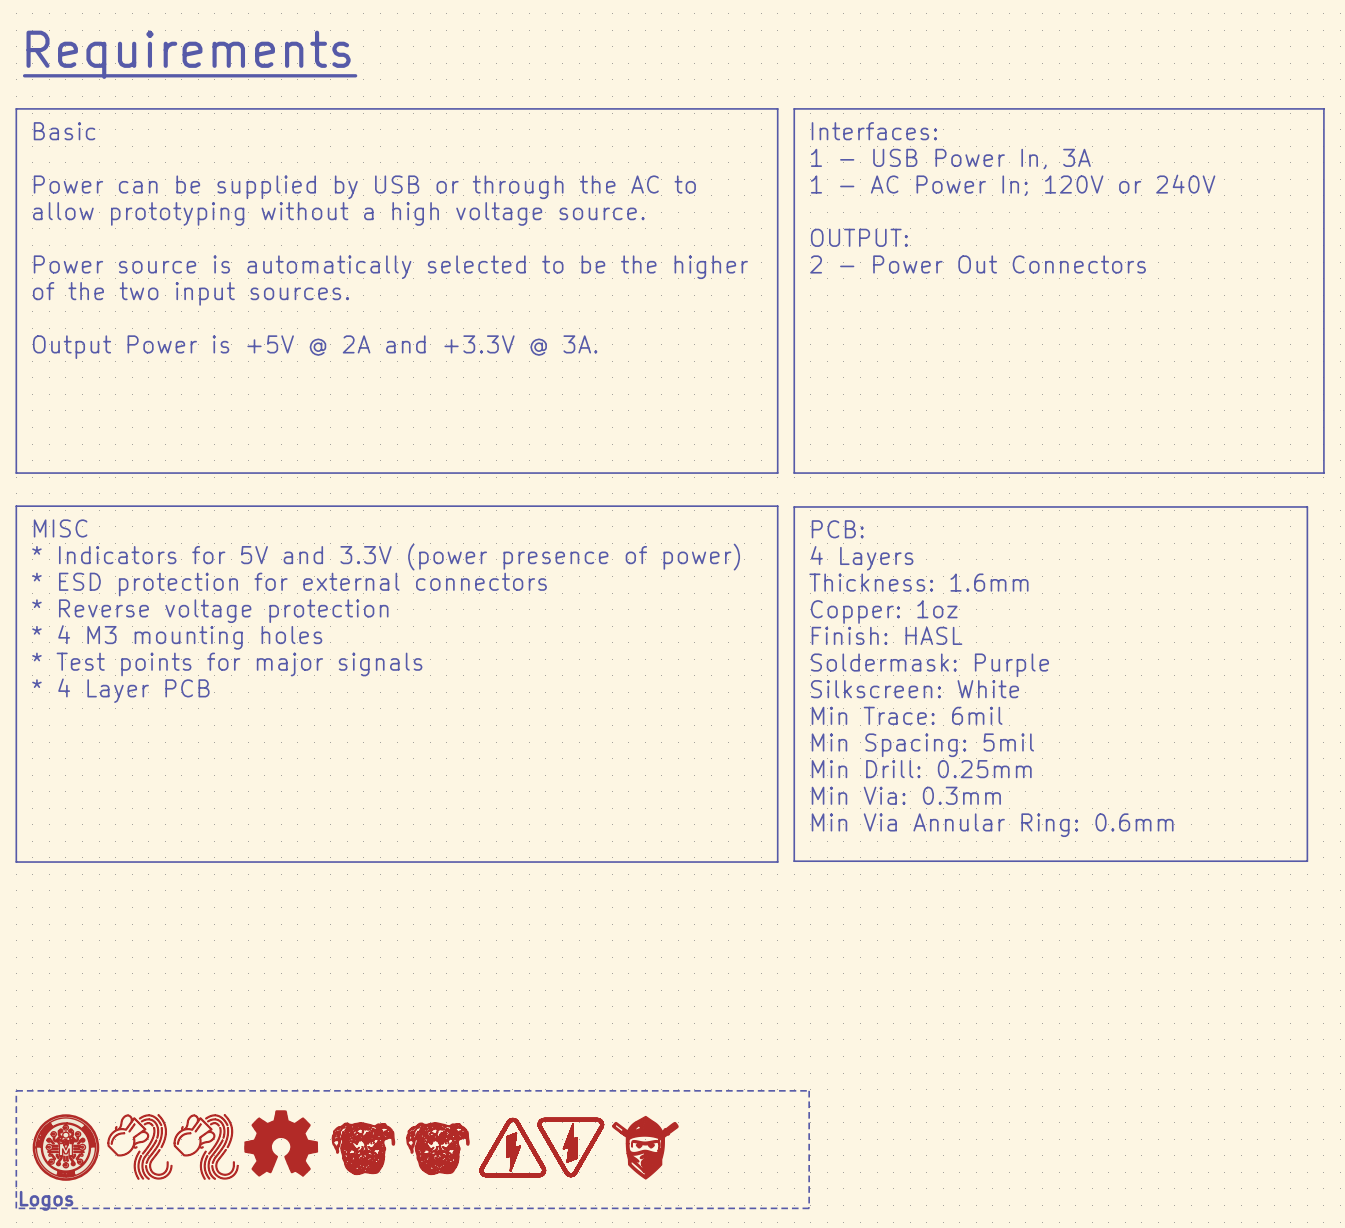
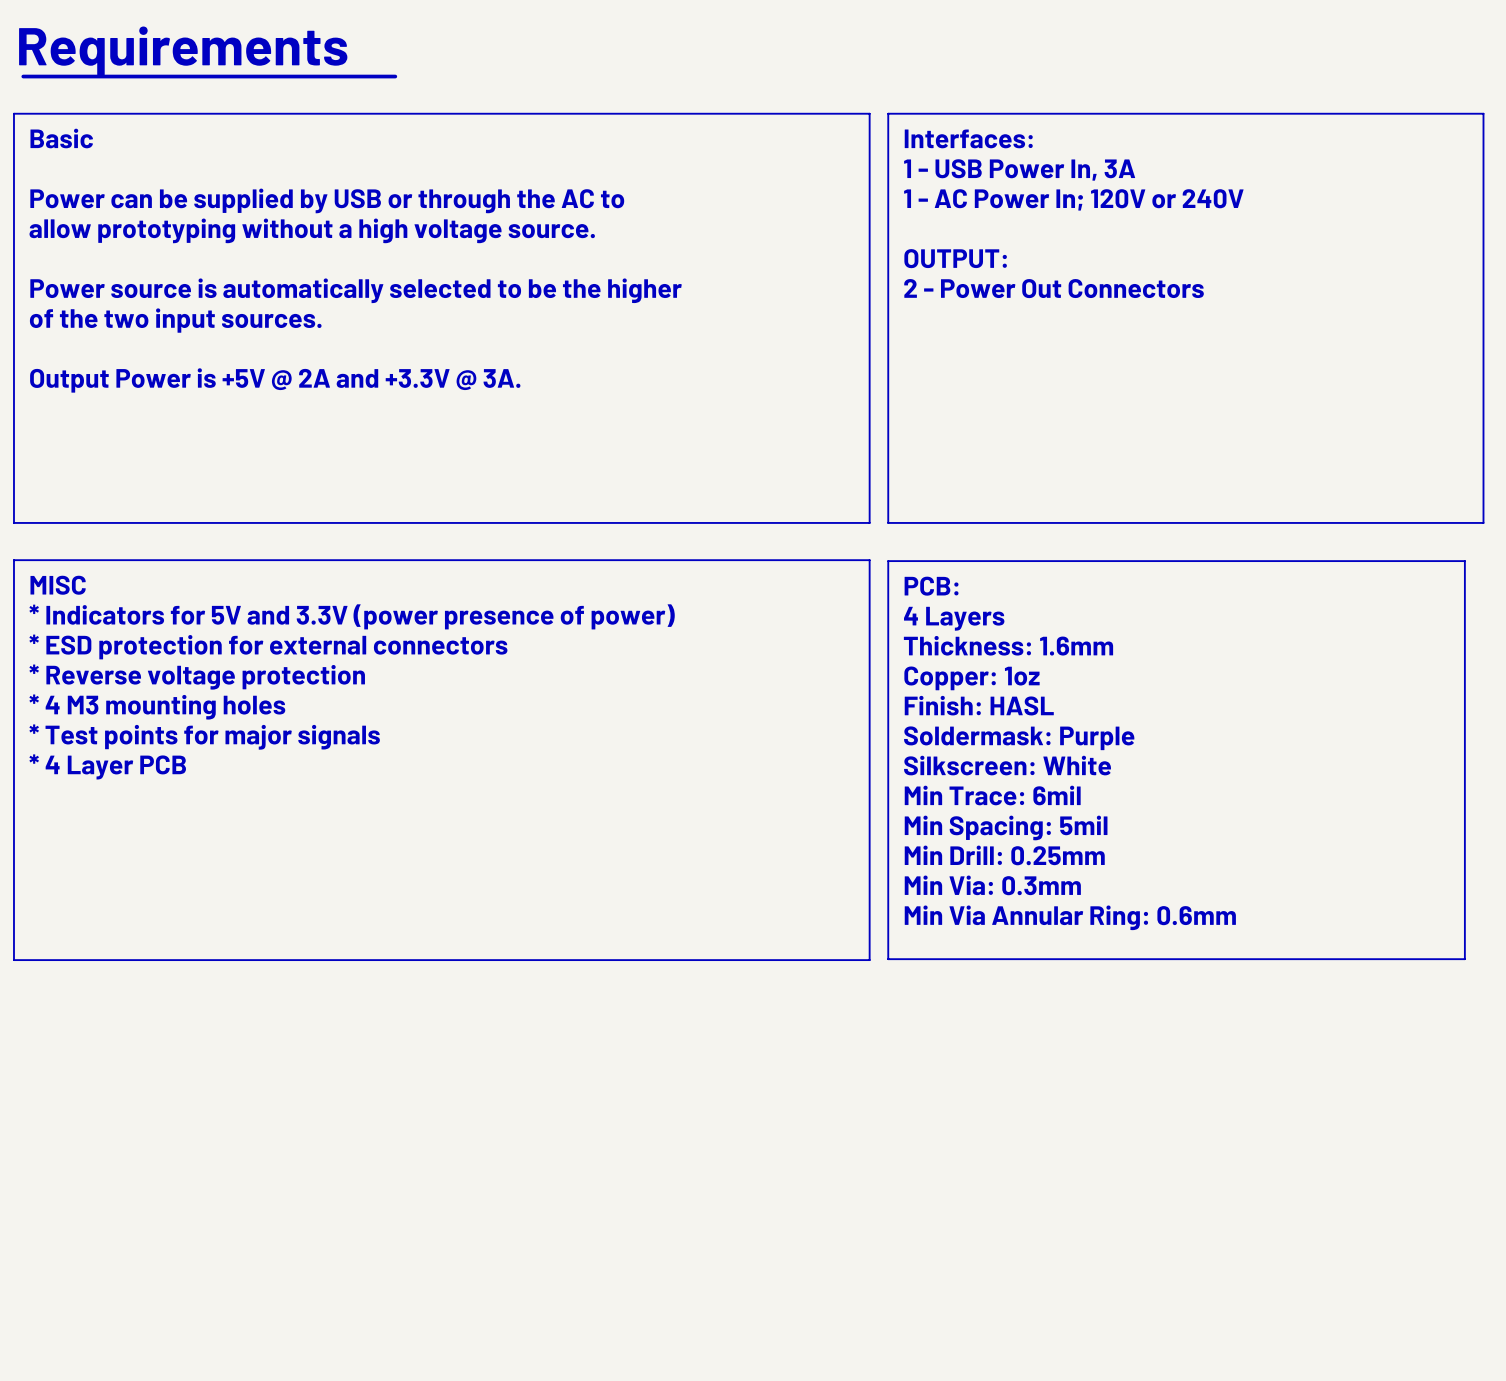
line: (16, 1090) (809, 1090) (809, 1208) (16, 1208) (16, 1090) -> none
part: (281, 1143) -> none
part: (65, 1147) -> none
part: (139, 1147) -> none
part: (206, 1147) -> none
part: (512, 1147) -> none
part: (570, 1147) -> none
part: (645, 1147) -> none
part: (363, 1148) -> none
part: (437, 1148) -> none
text: Logos (46, 1200) -> none

